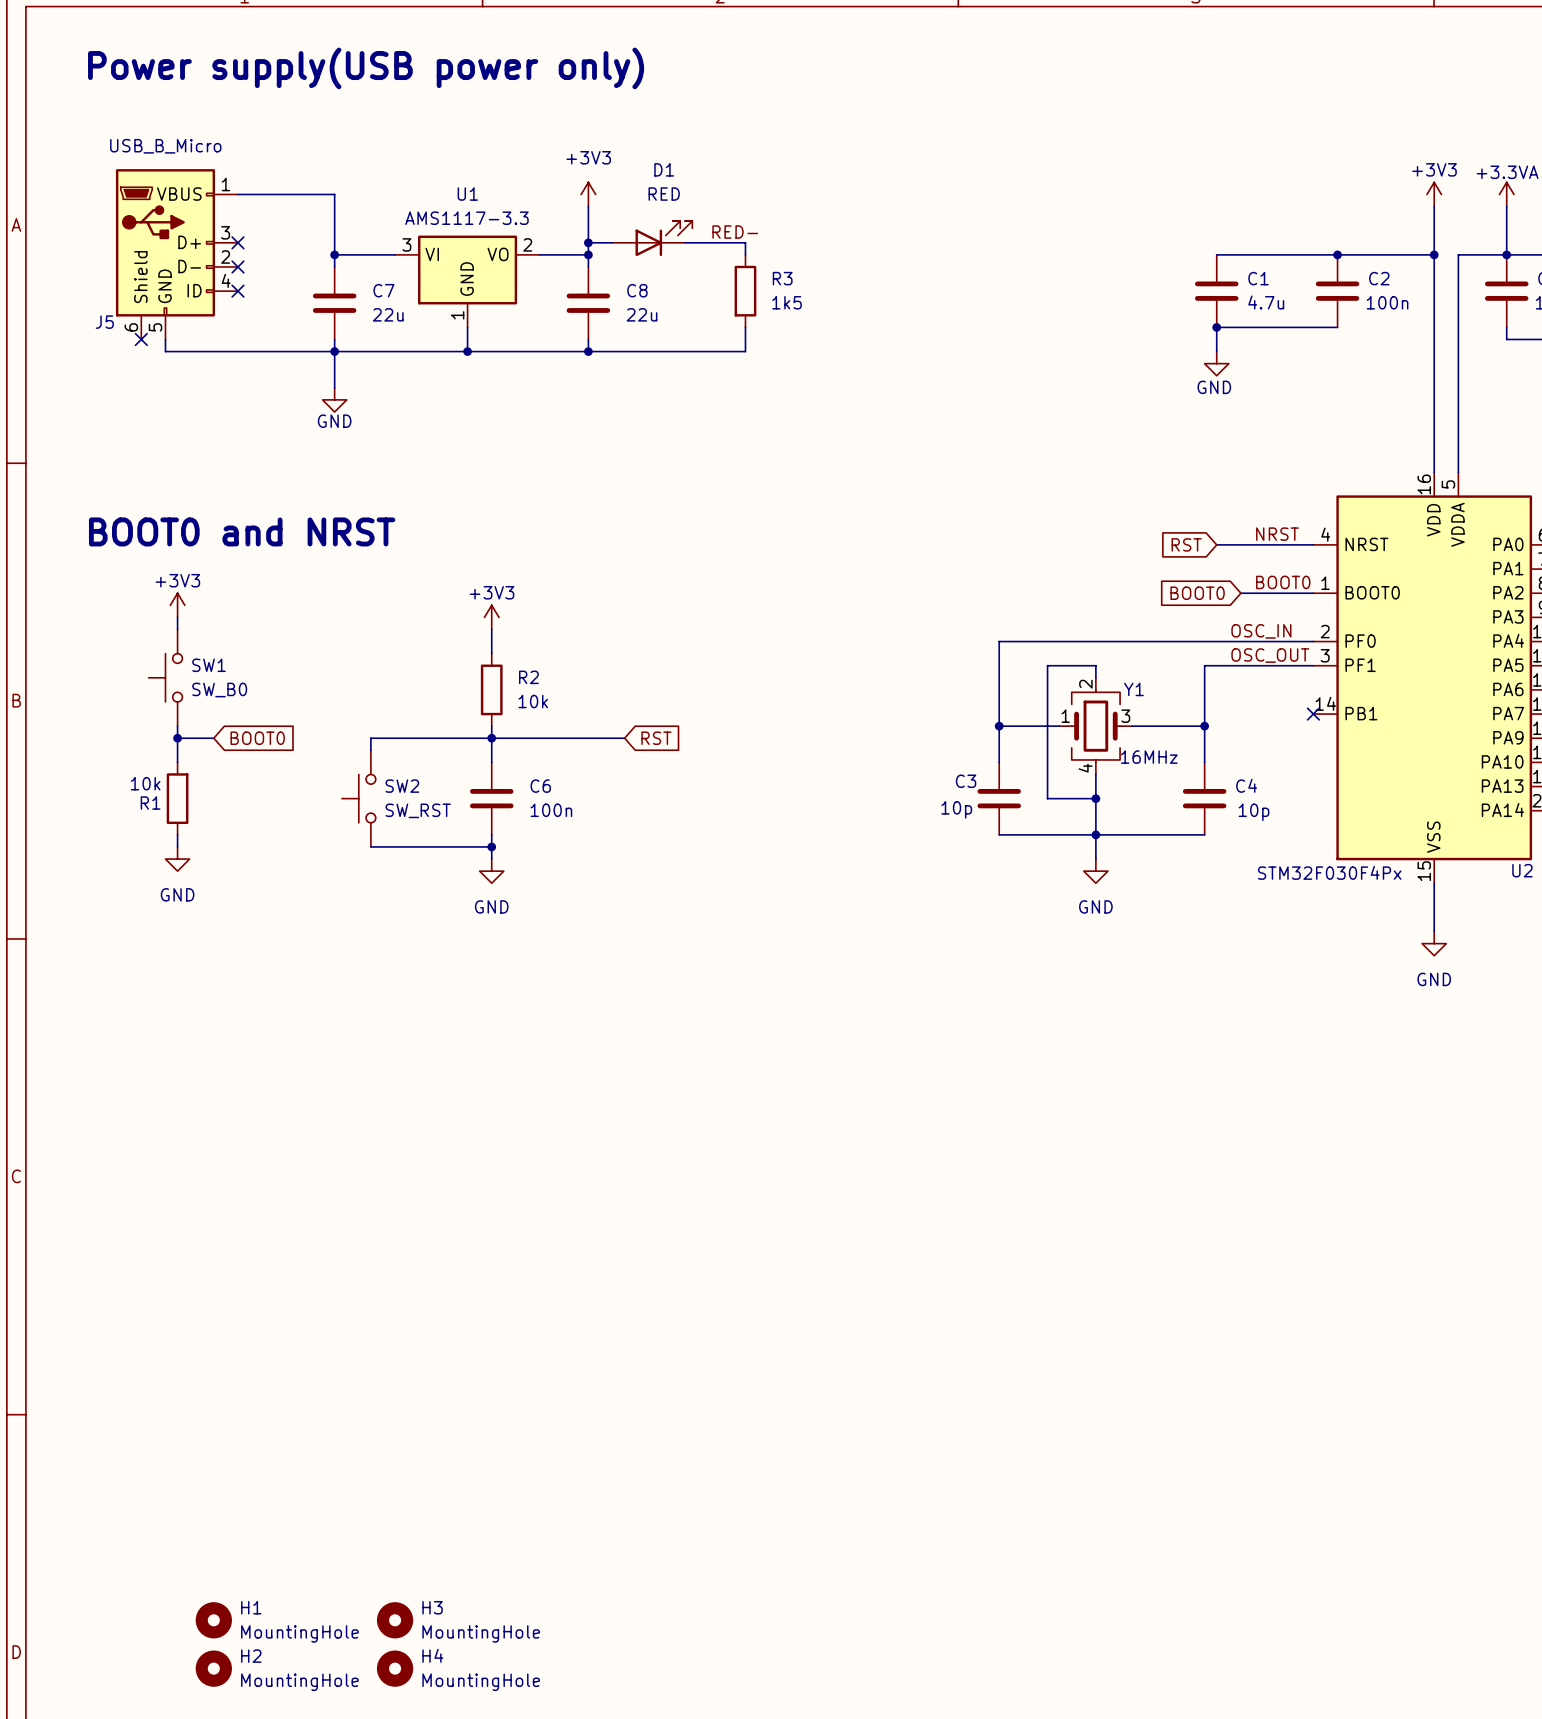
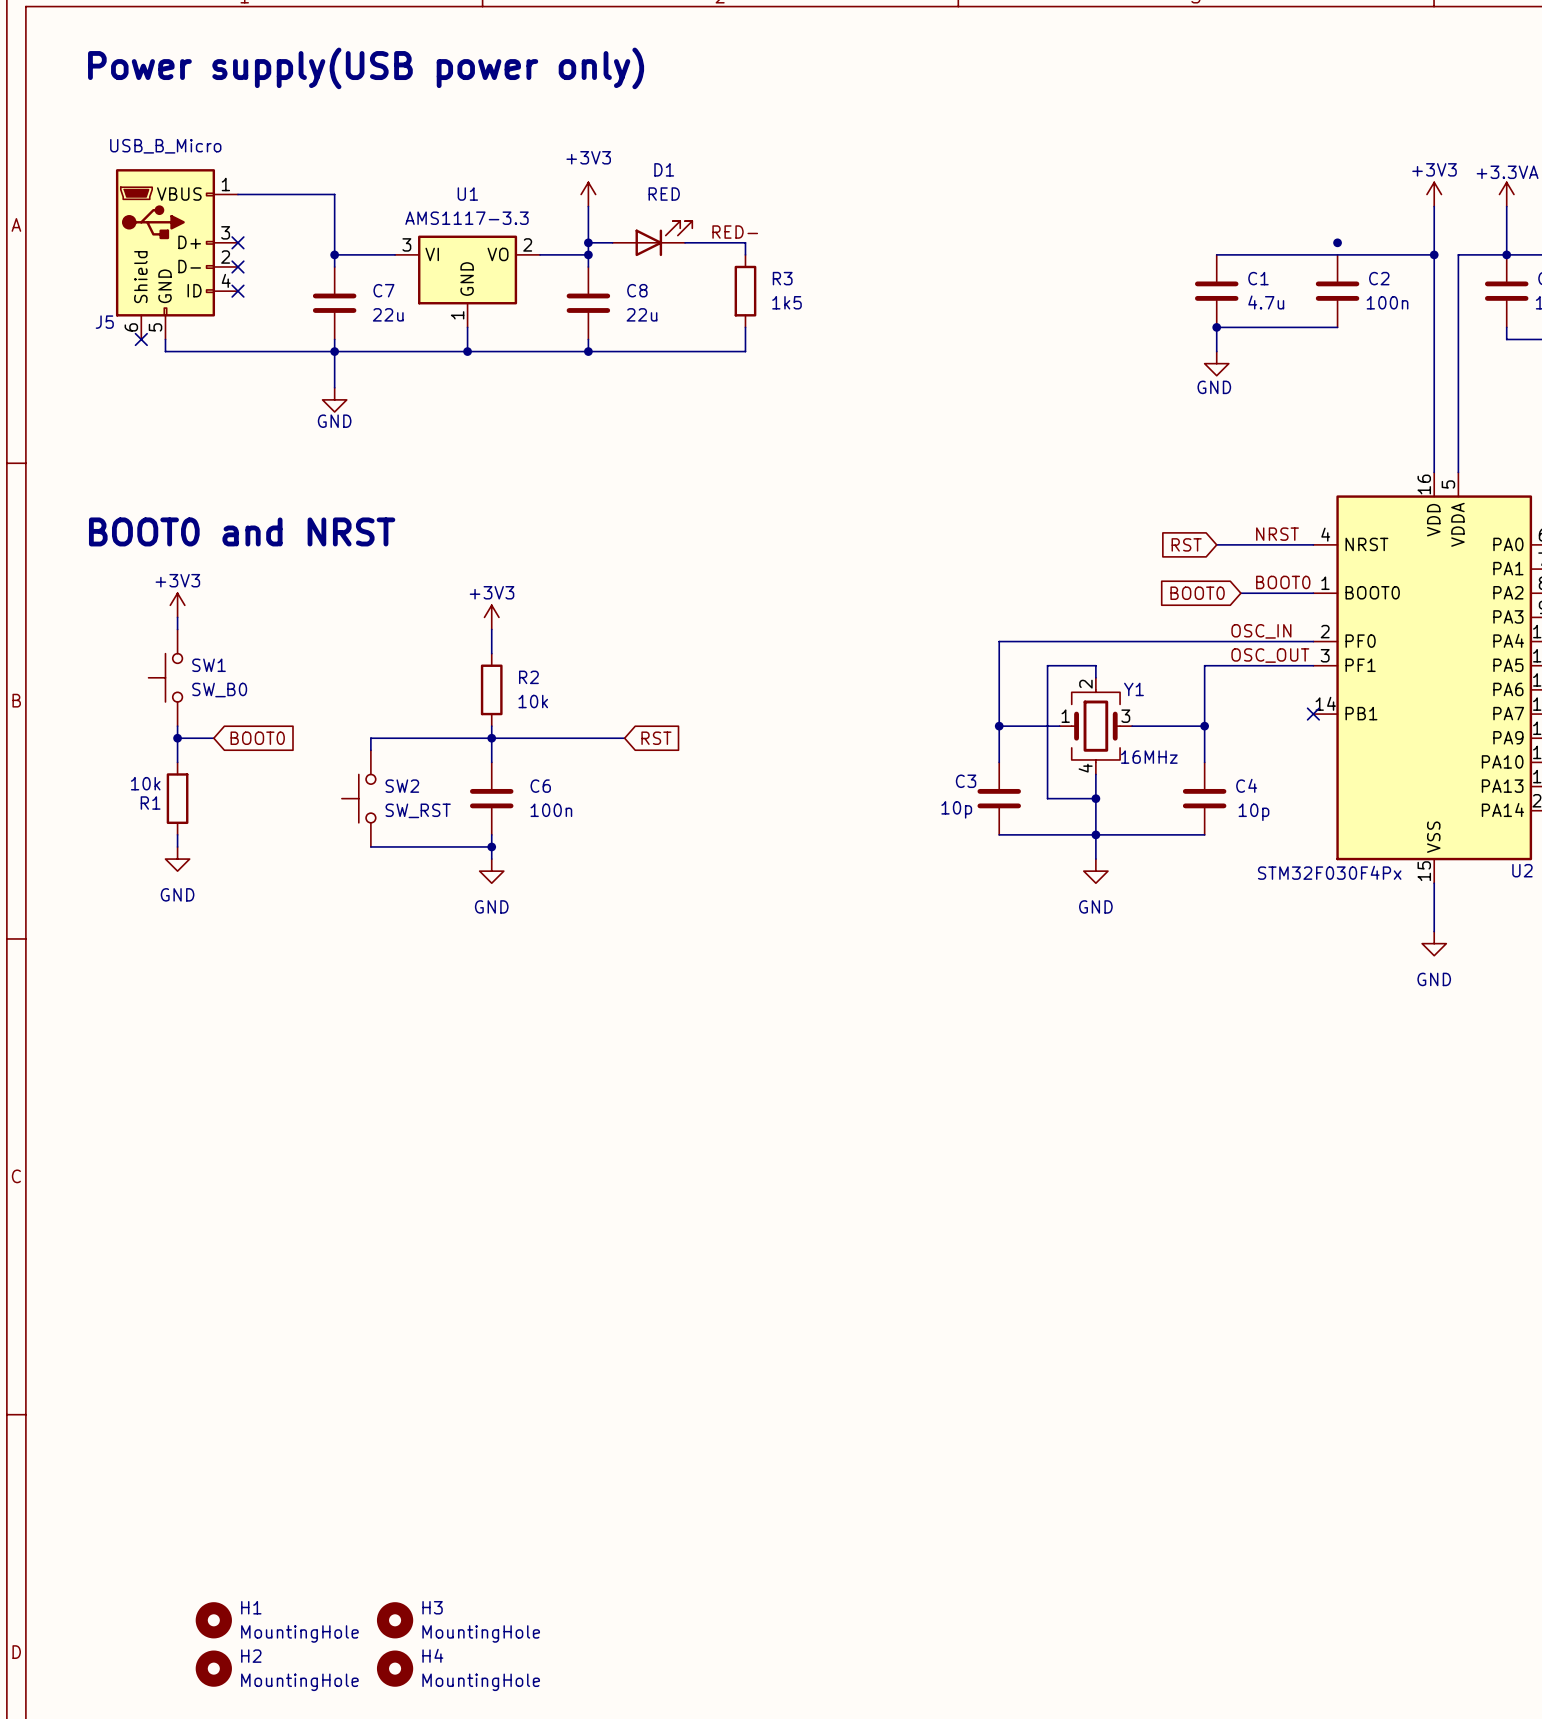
junction position: (1337, 254) -> (1337, 242)

